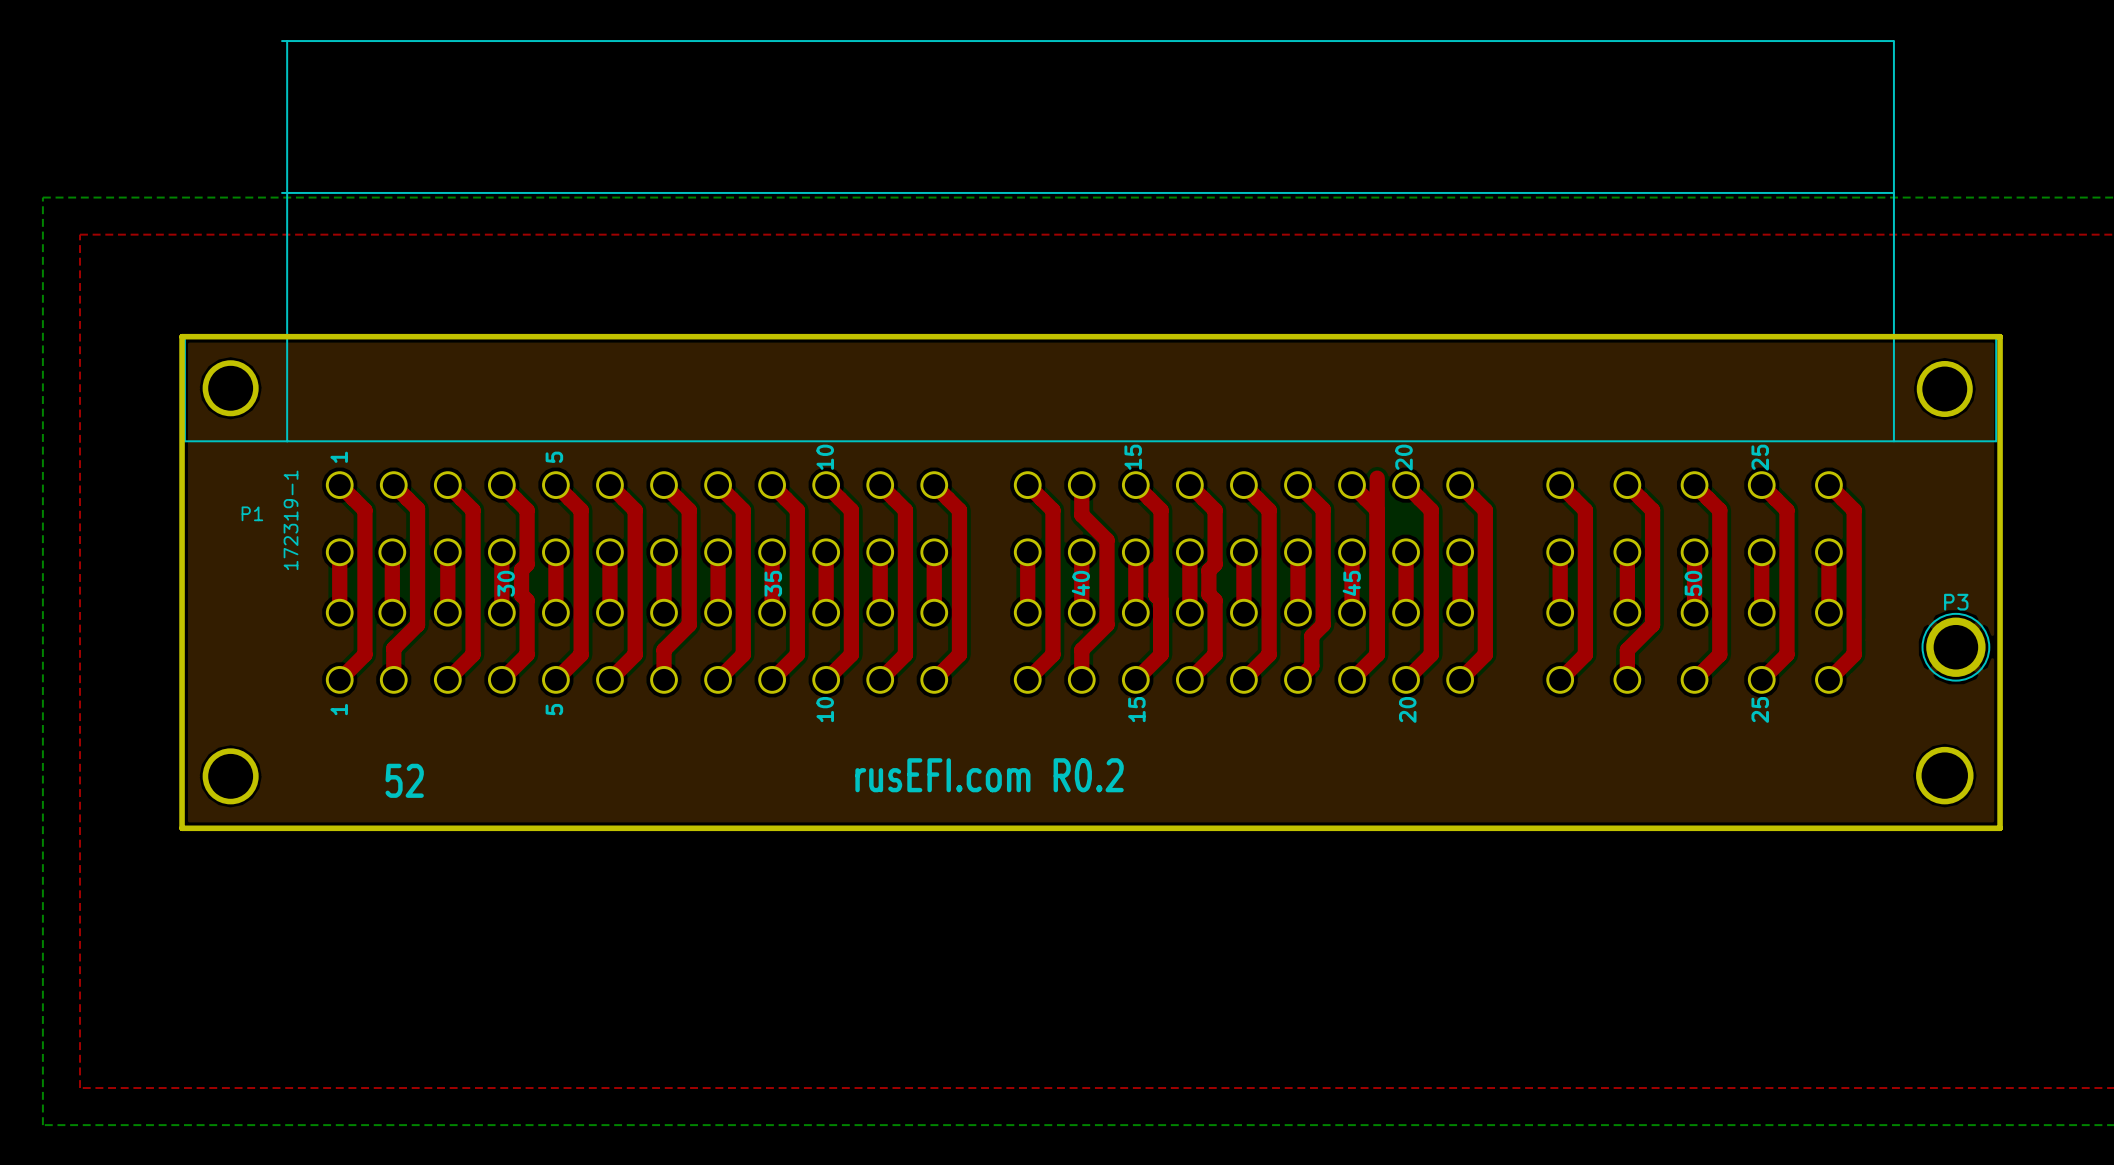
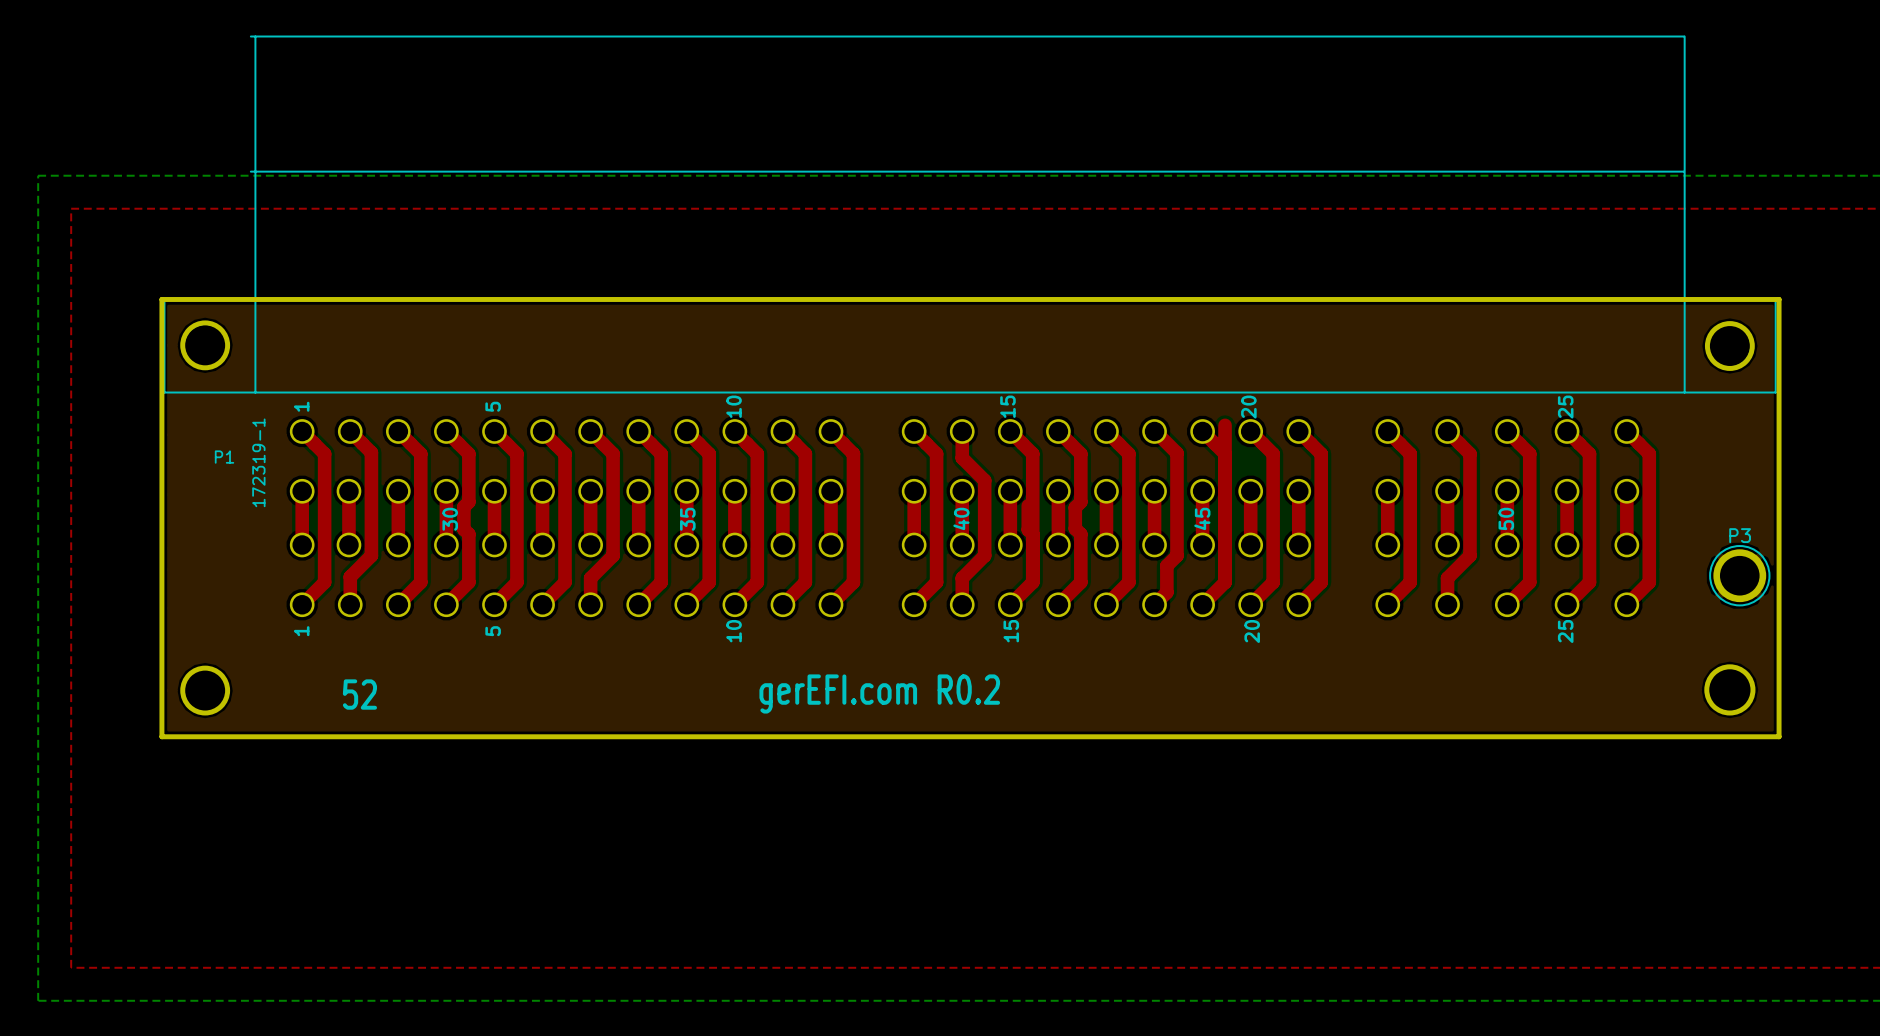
text: rusEFI.com R0.2 (989, 775) -> gerEFI.com R0.2 (879, 693)

